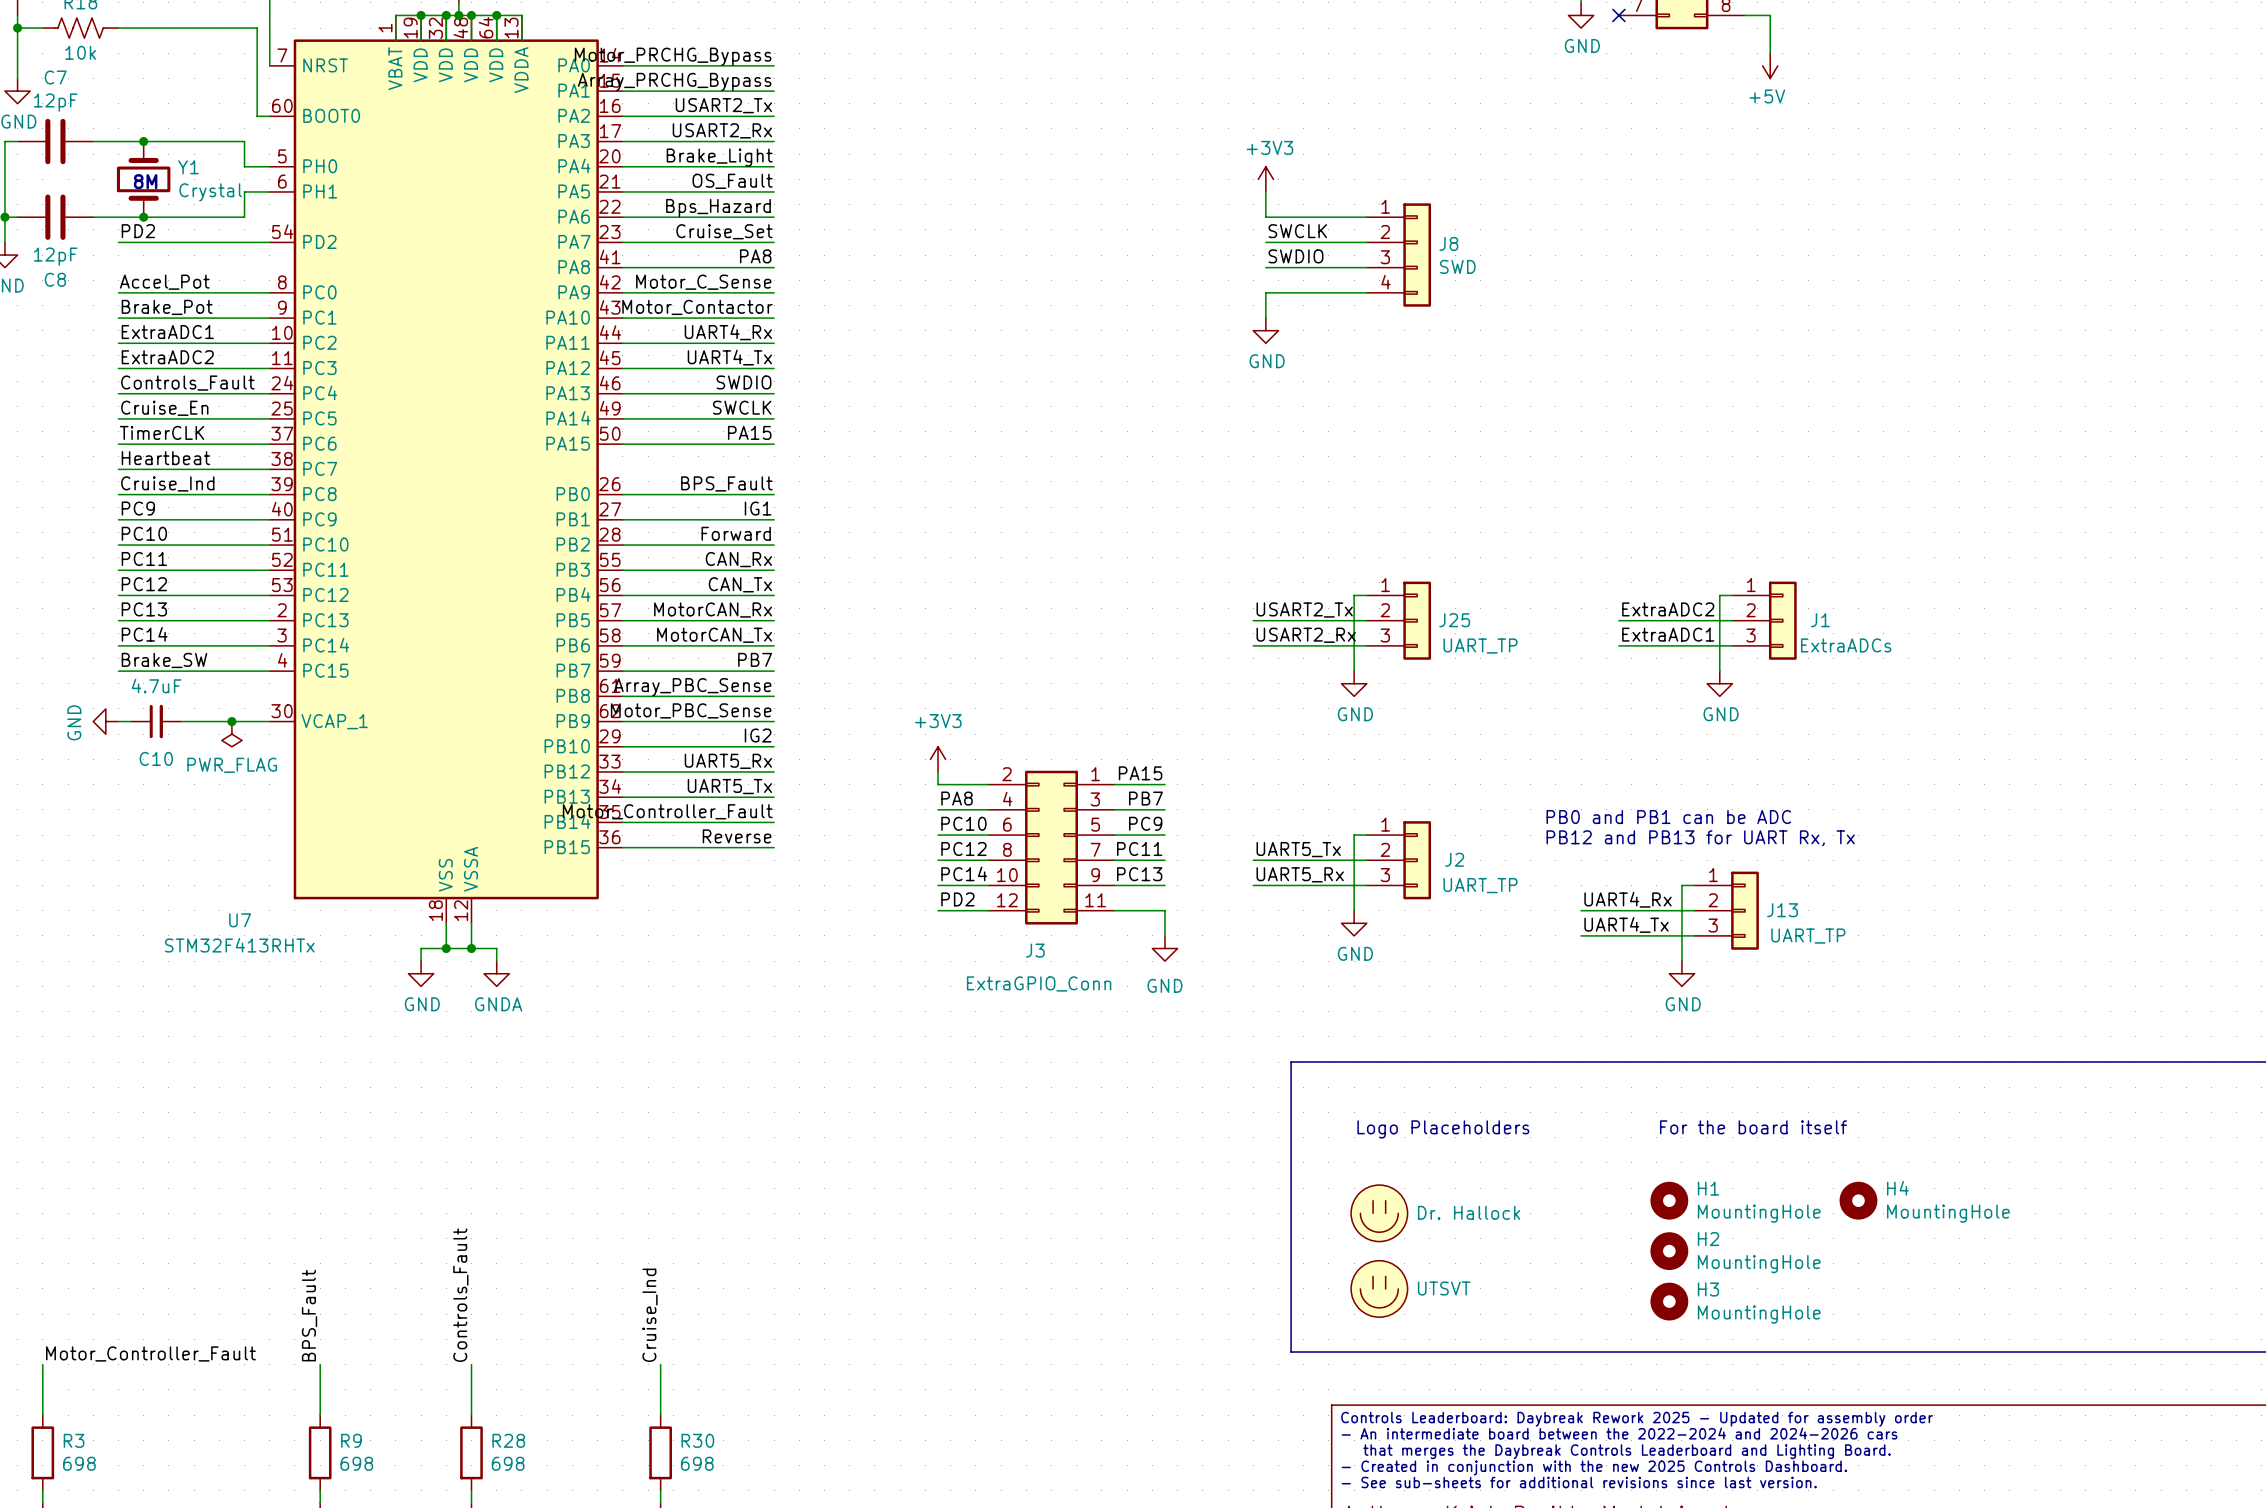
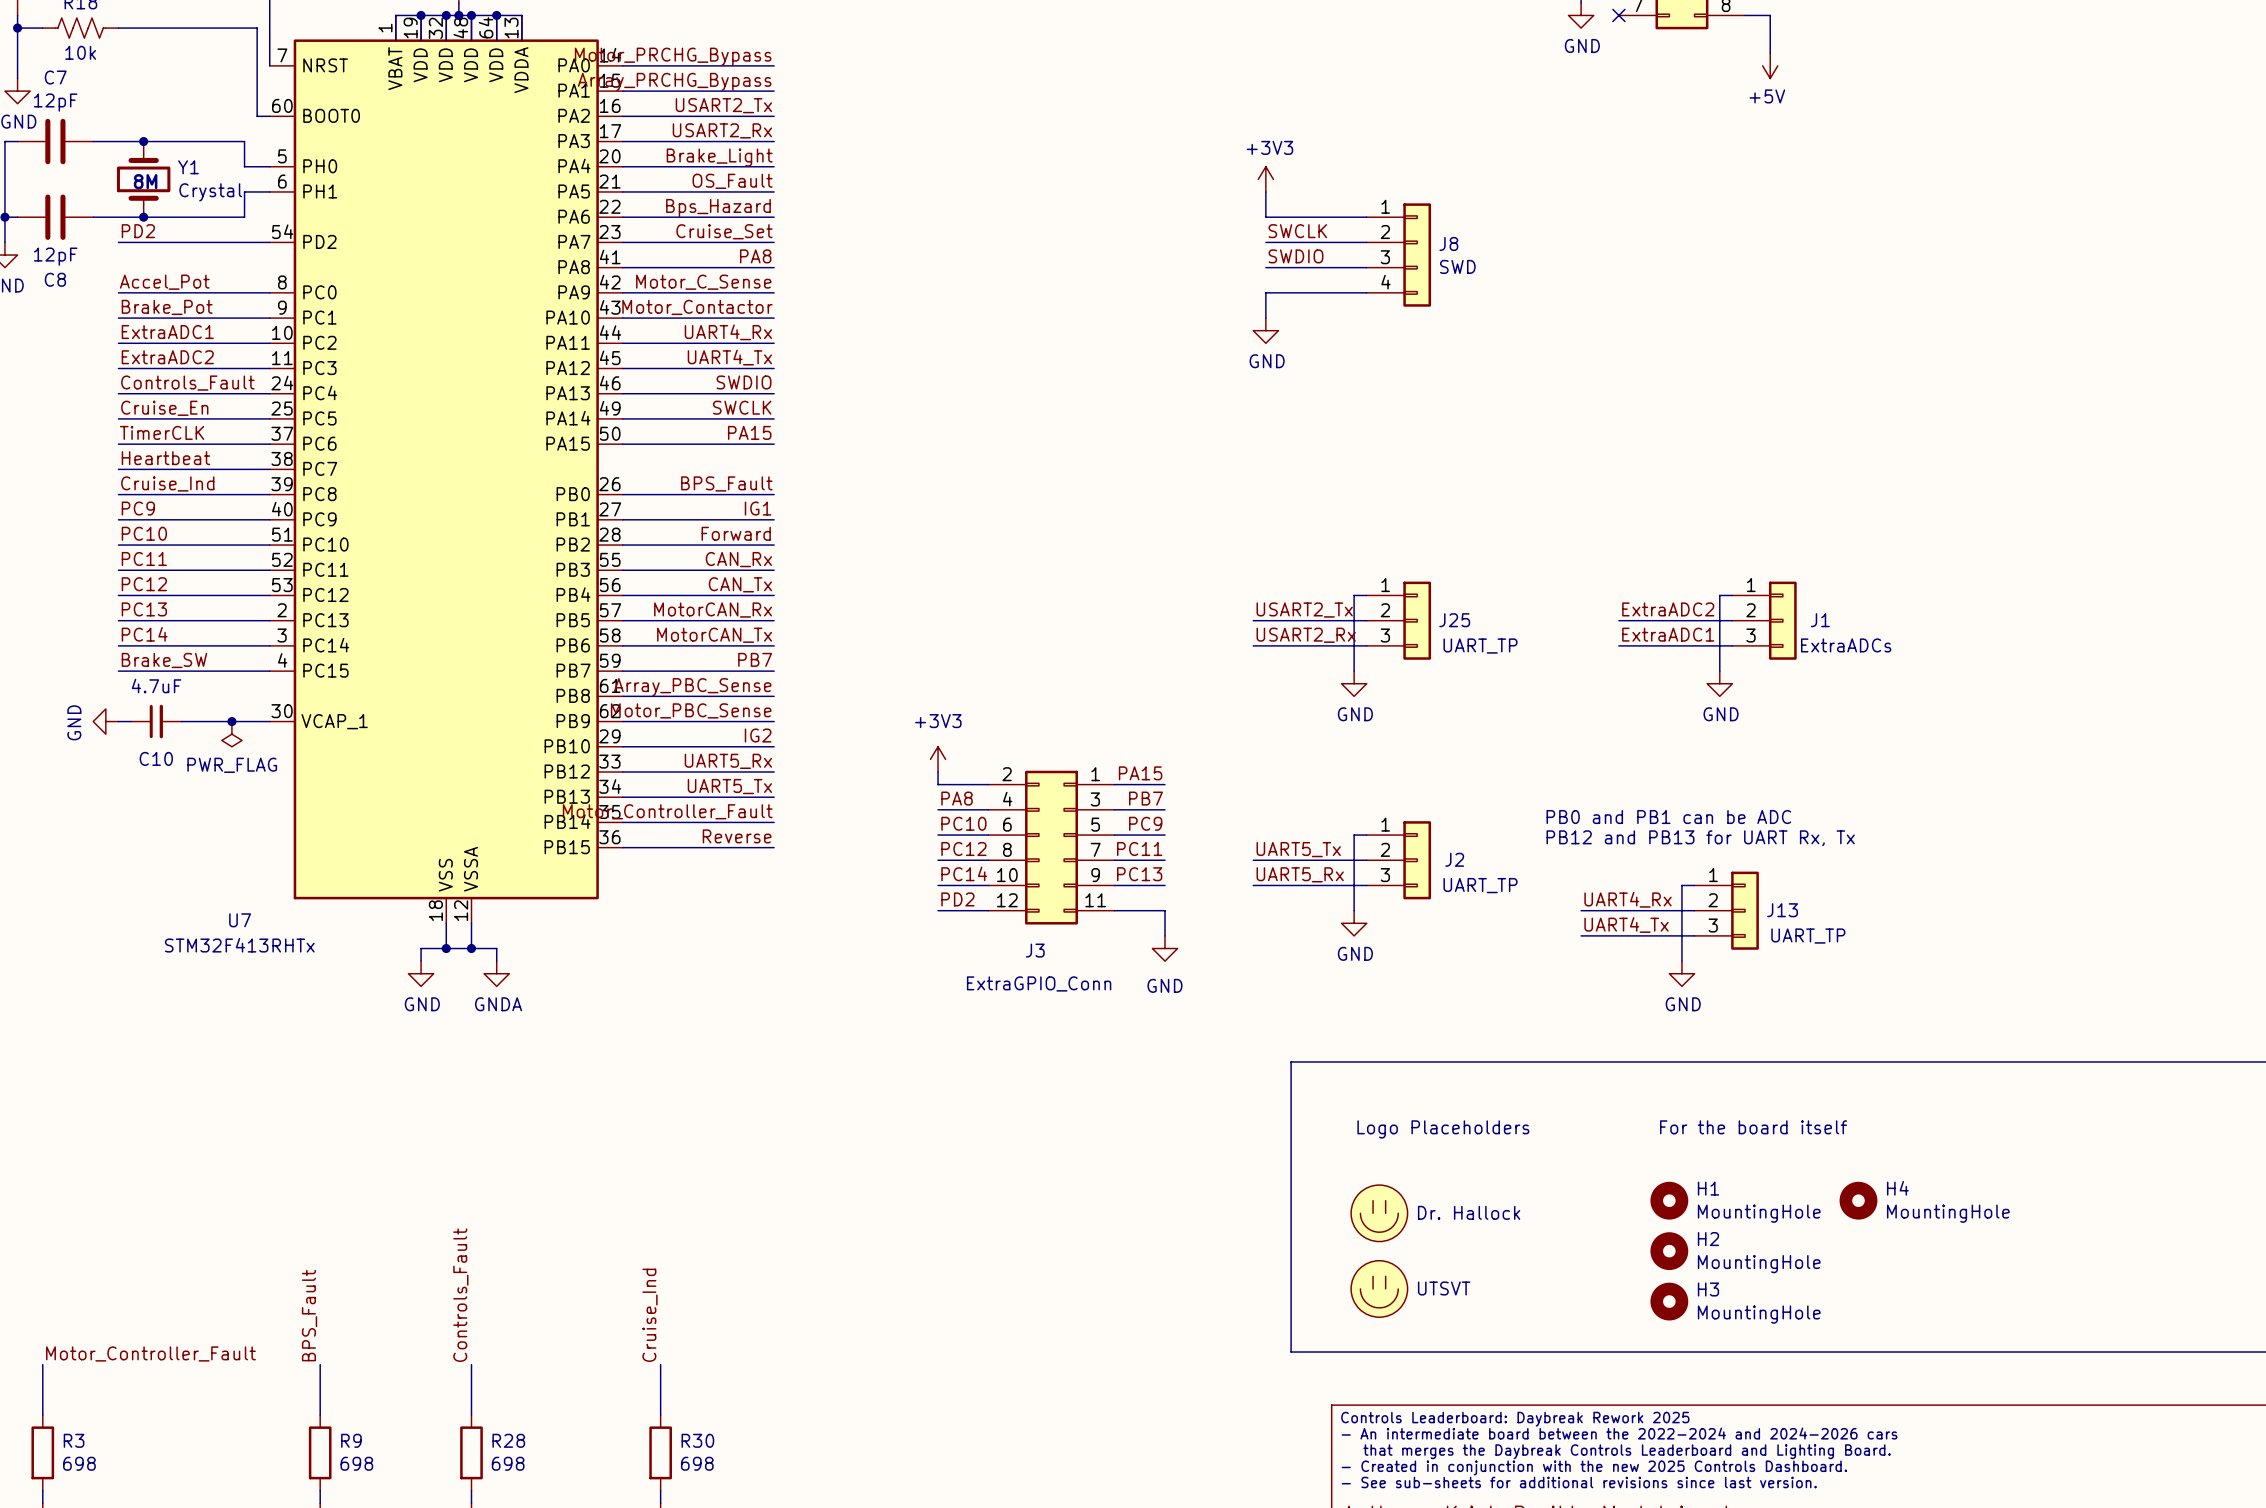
text: Controls Leaderboard: Daybreak Rework 2025 - Updated for assembly order (1637, 1419) -> Controls Leaderboard: Daybreak Rework 2025 (1515, 1419)

